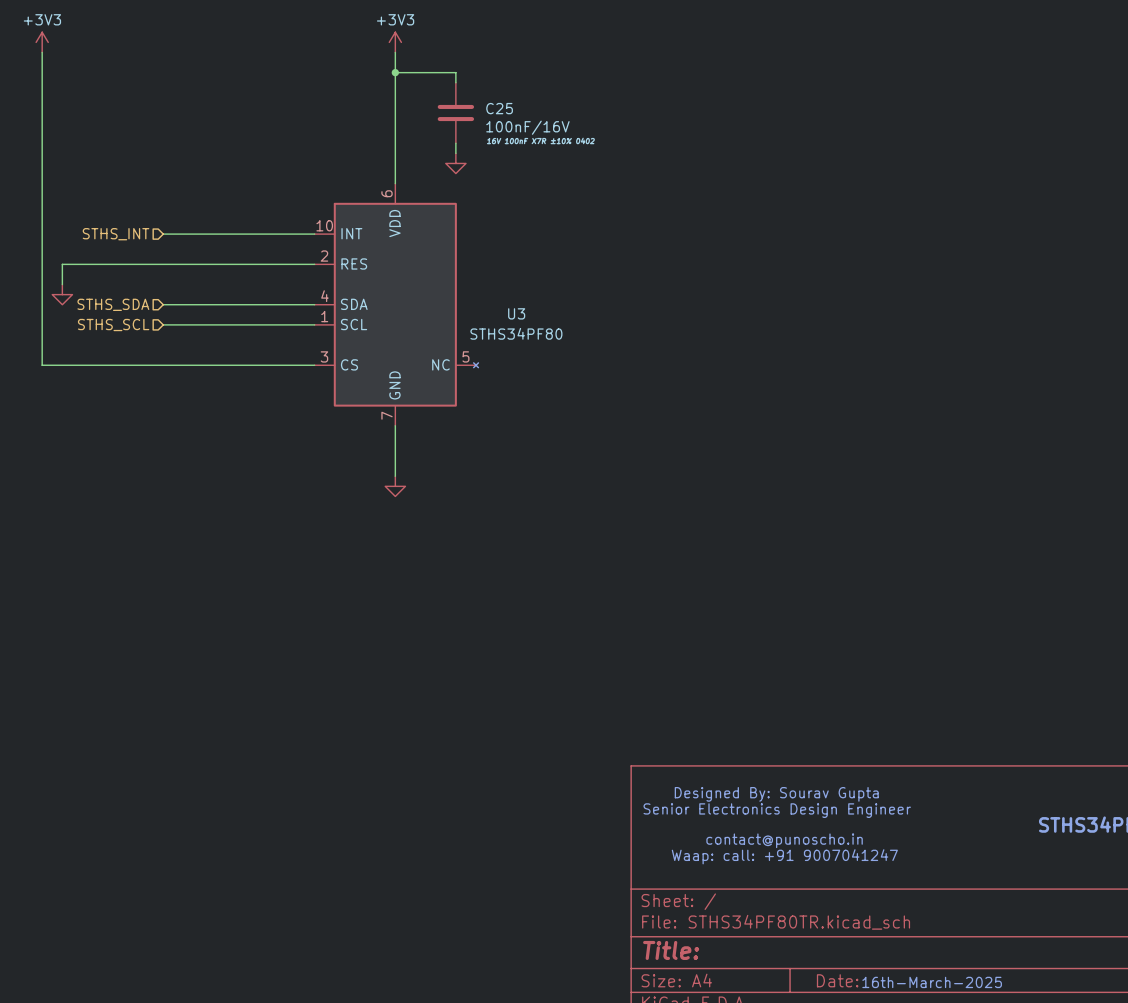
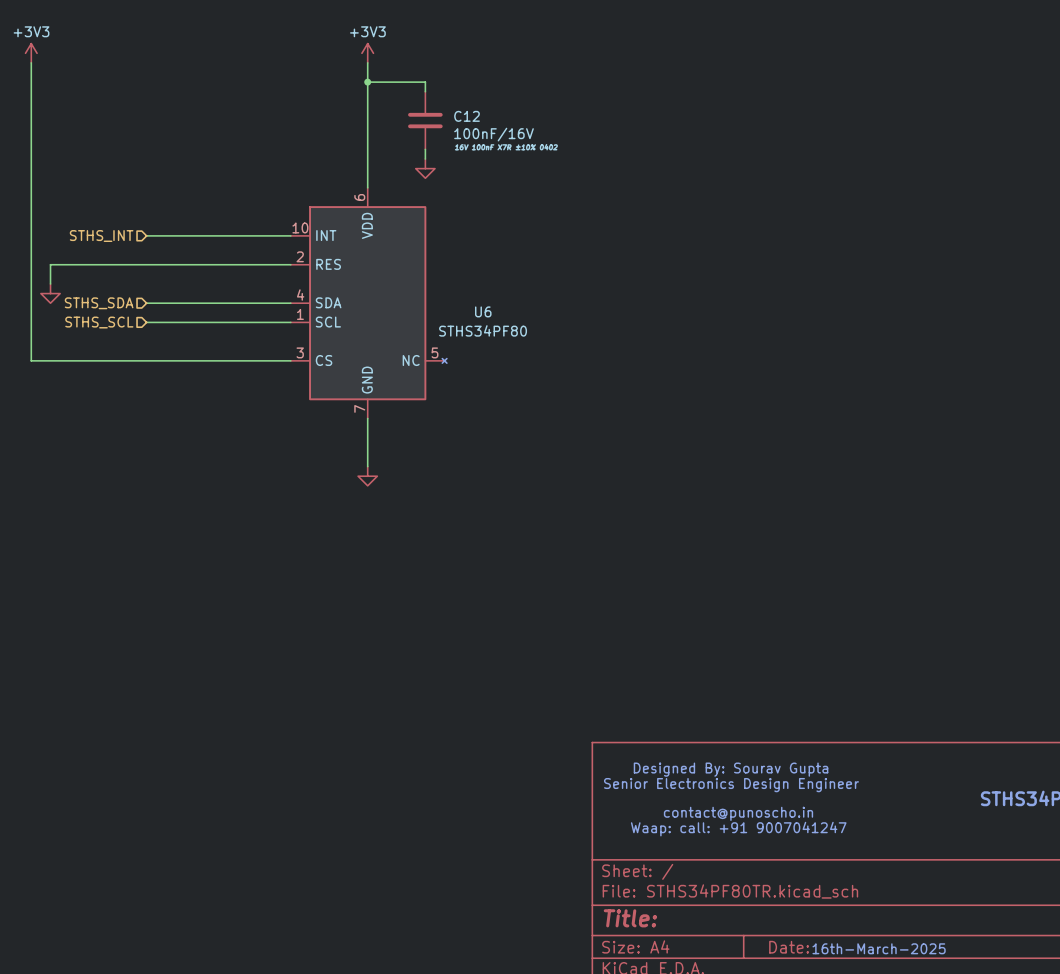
C25 name: C25 (499, 108) -> C12 (467, 116)
U3 name: U3 (516, 313) -> U6 (483, 311)

